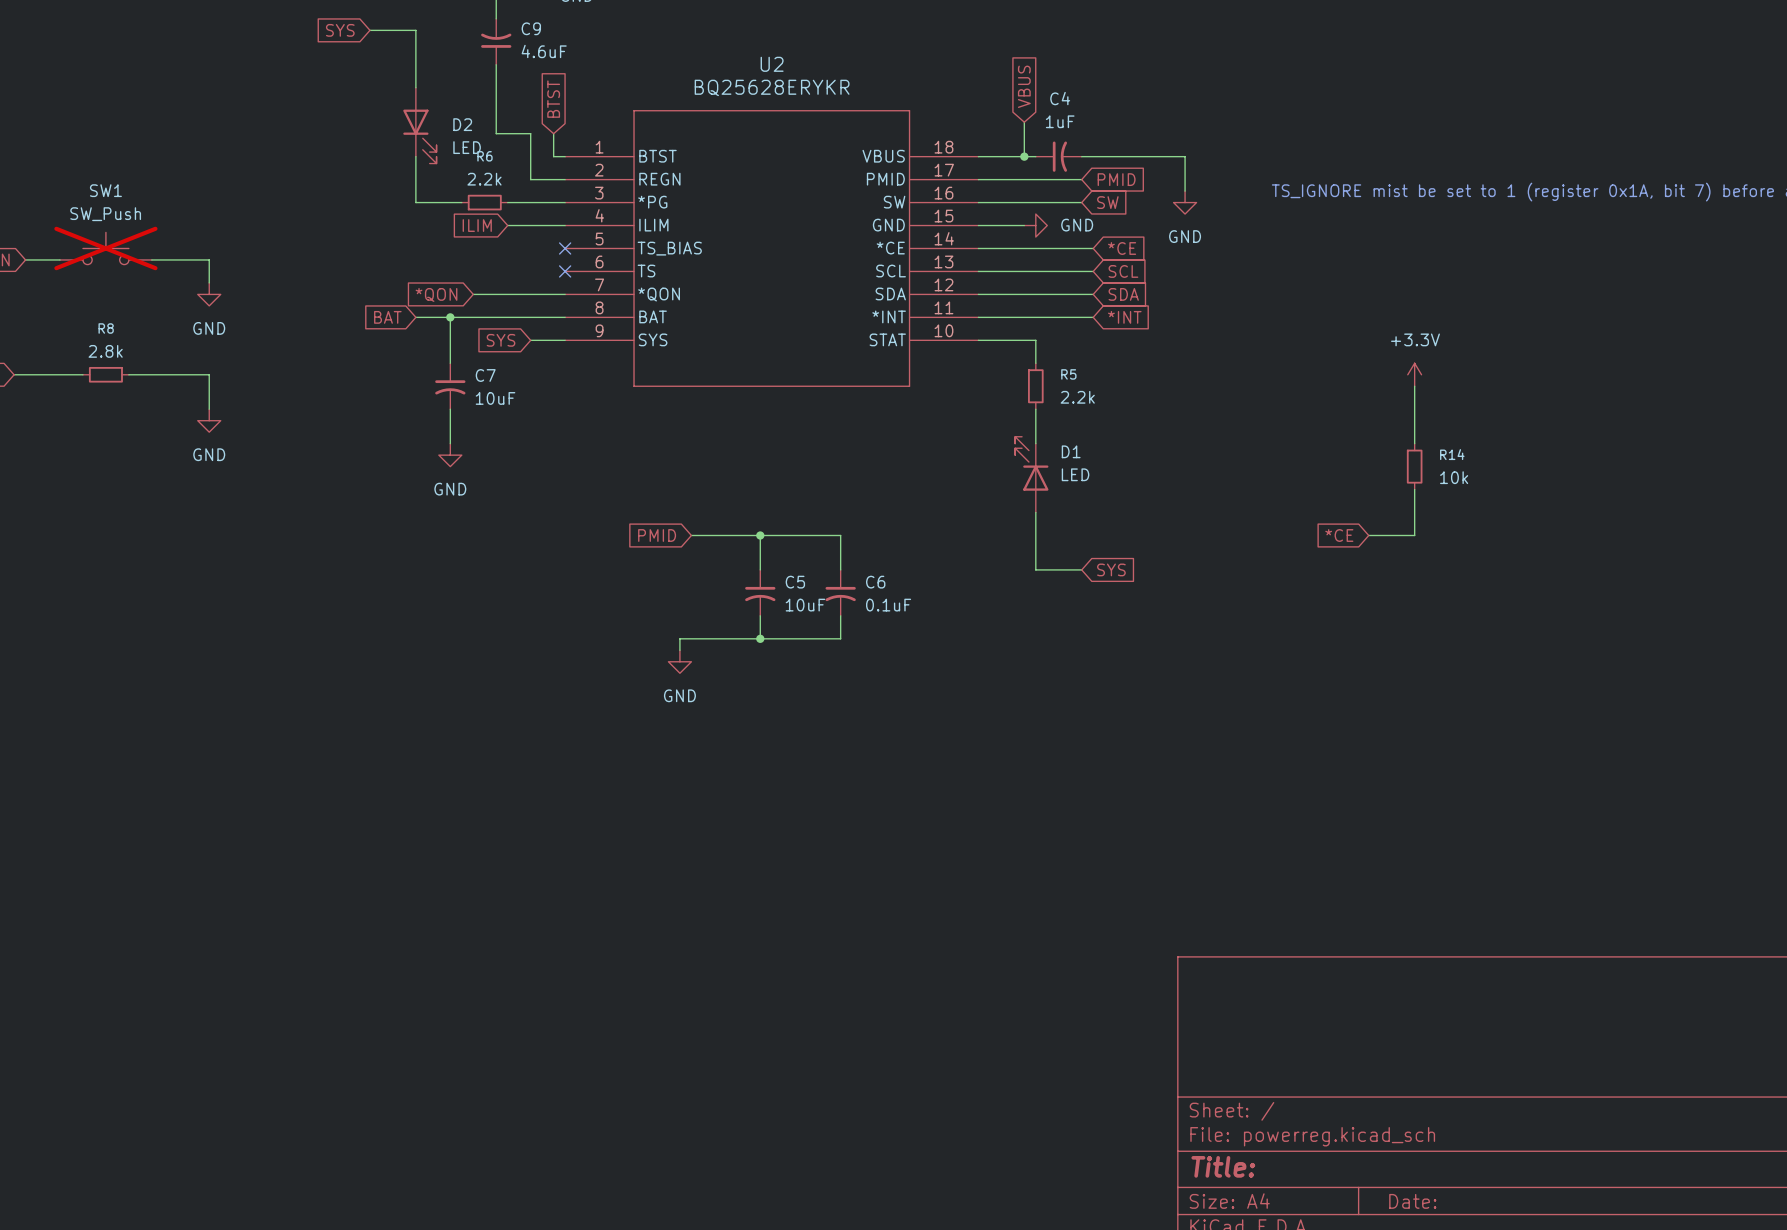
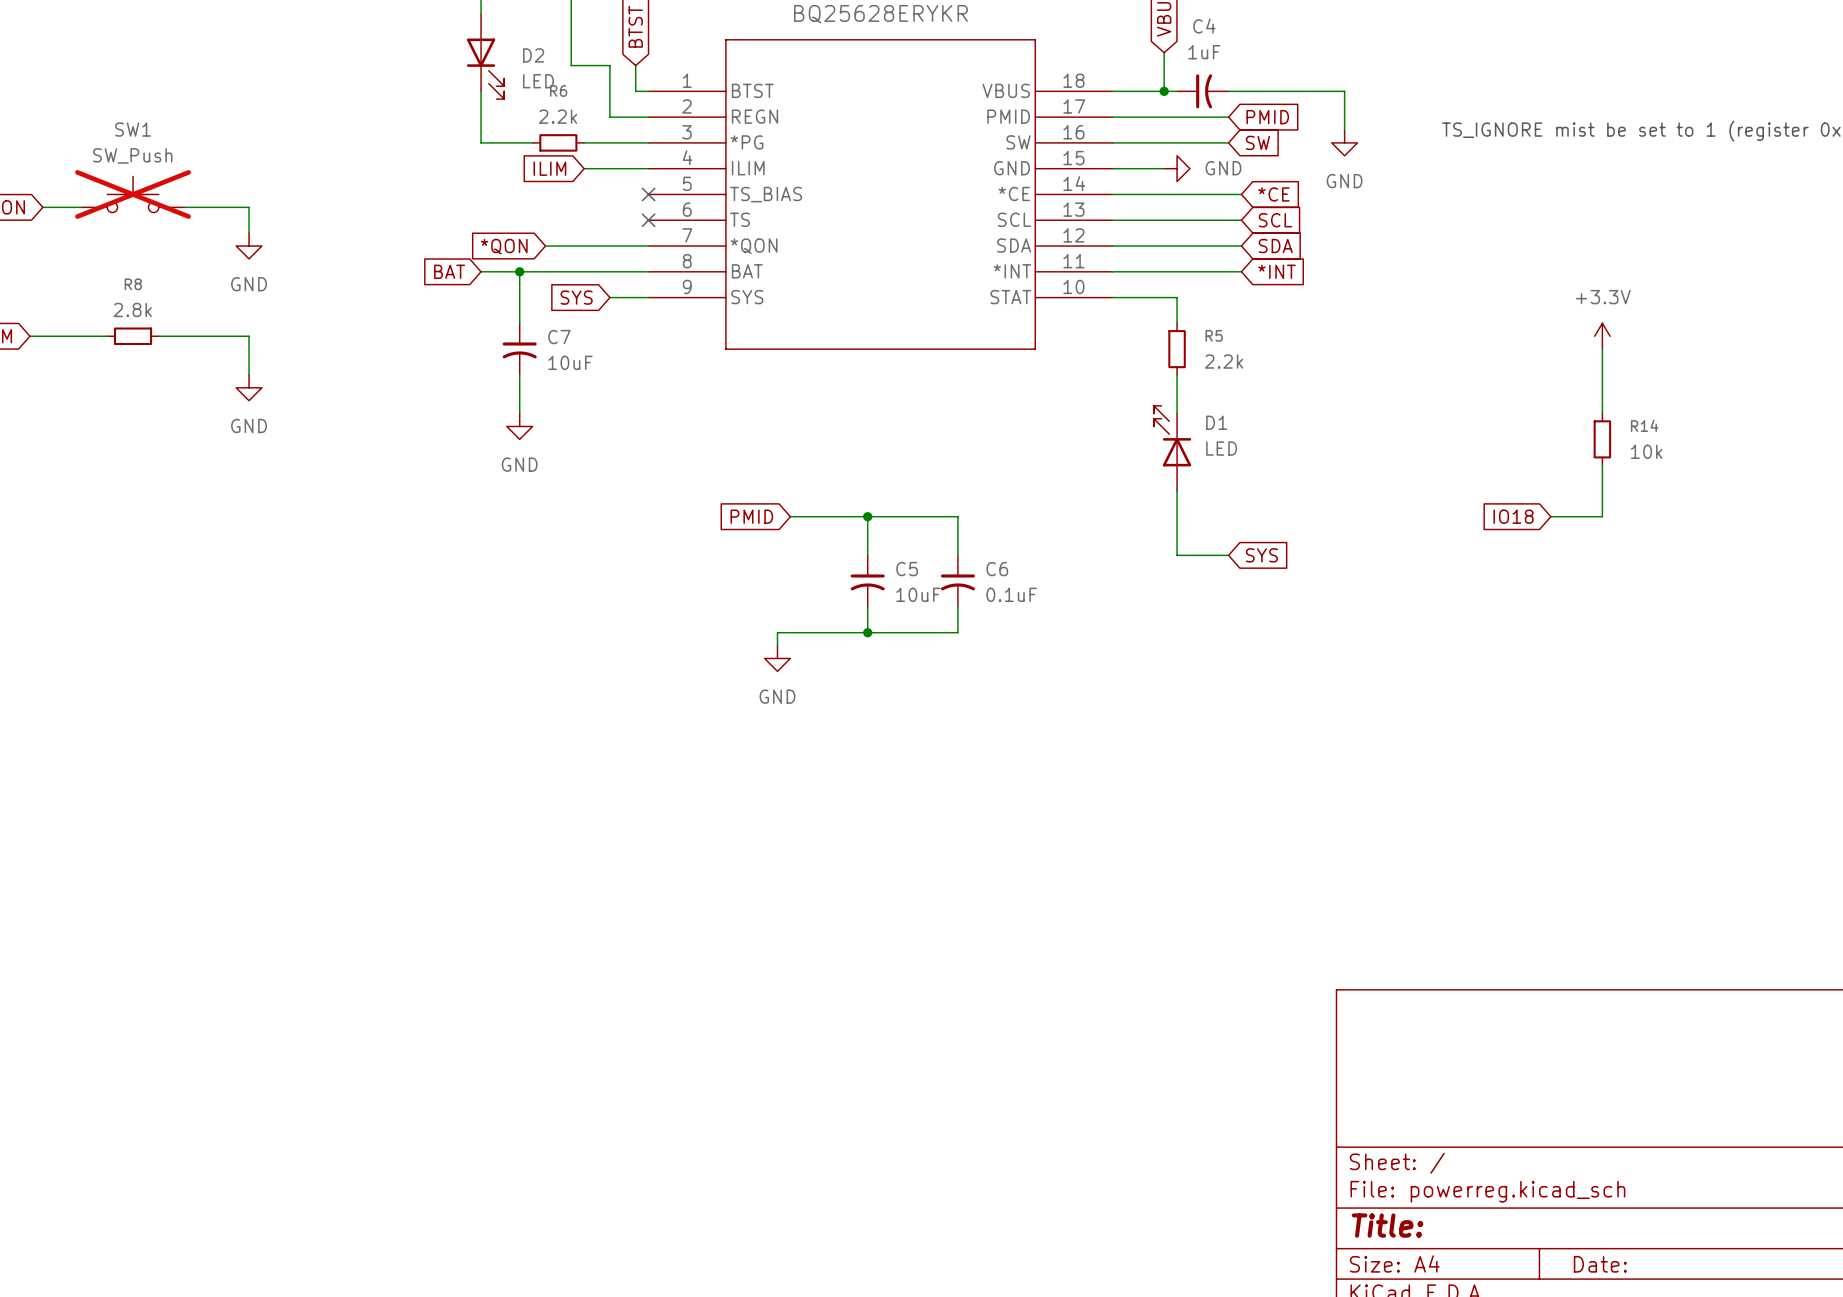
global label: *CE (1339, 535) -> IO18 (1513, 516)

